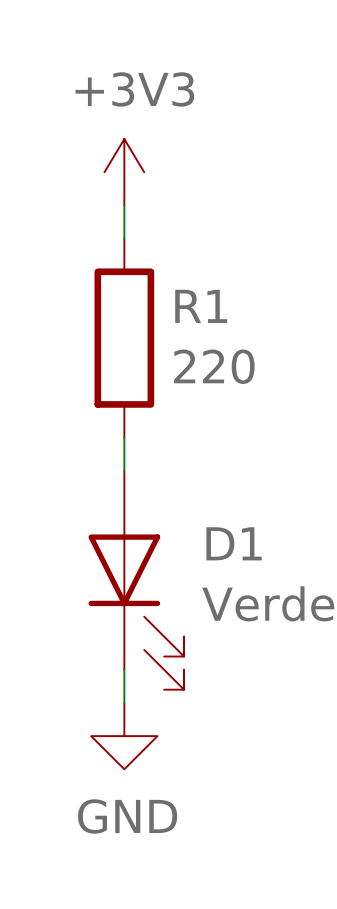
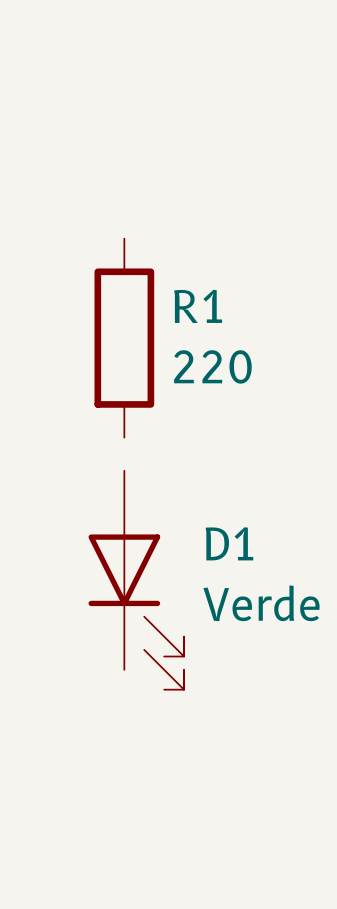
power symbol: +3V3 (124, 172) -> none
wire: (124, 205) (124, 238) -> none
wire: (124, 437) (124, 470) -> none
wire: (124, 669) (124, 702) -> none
power symbol: GND (124, 736) -> none

